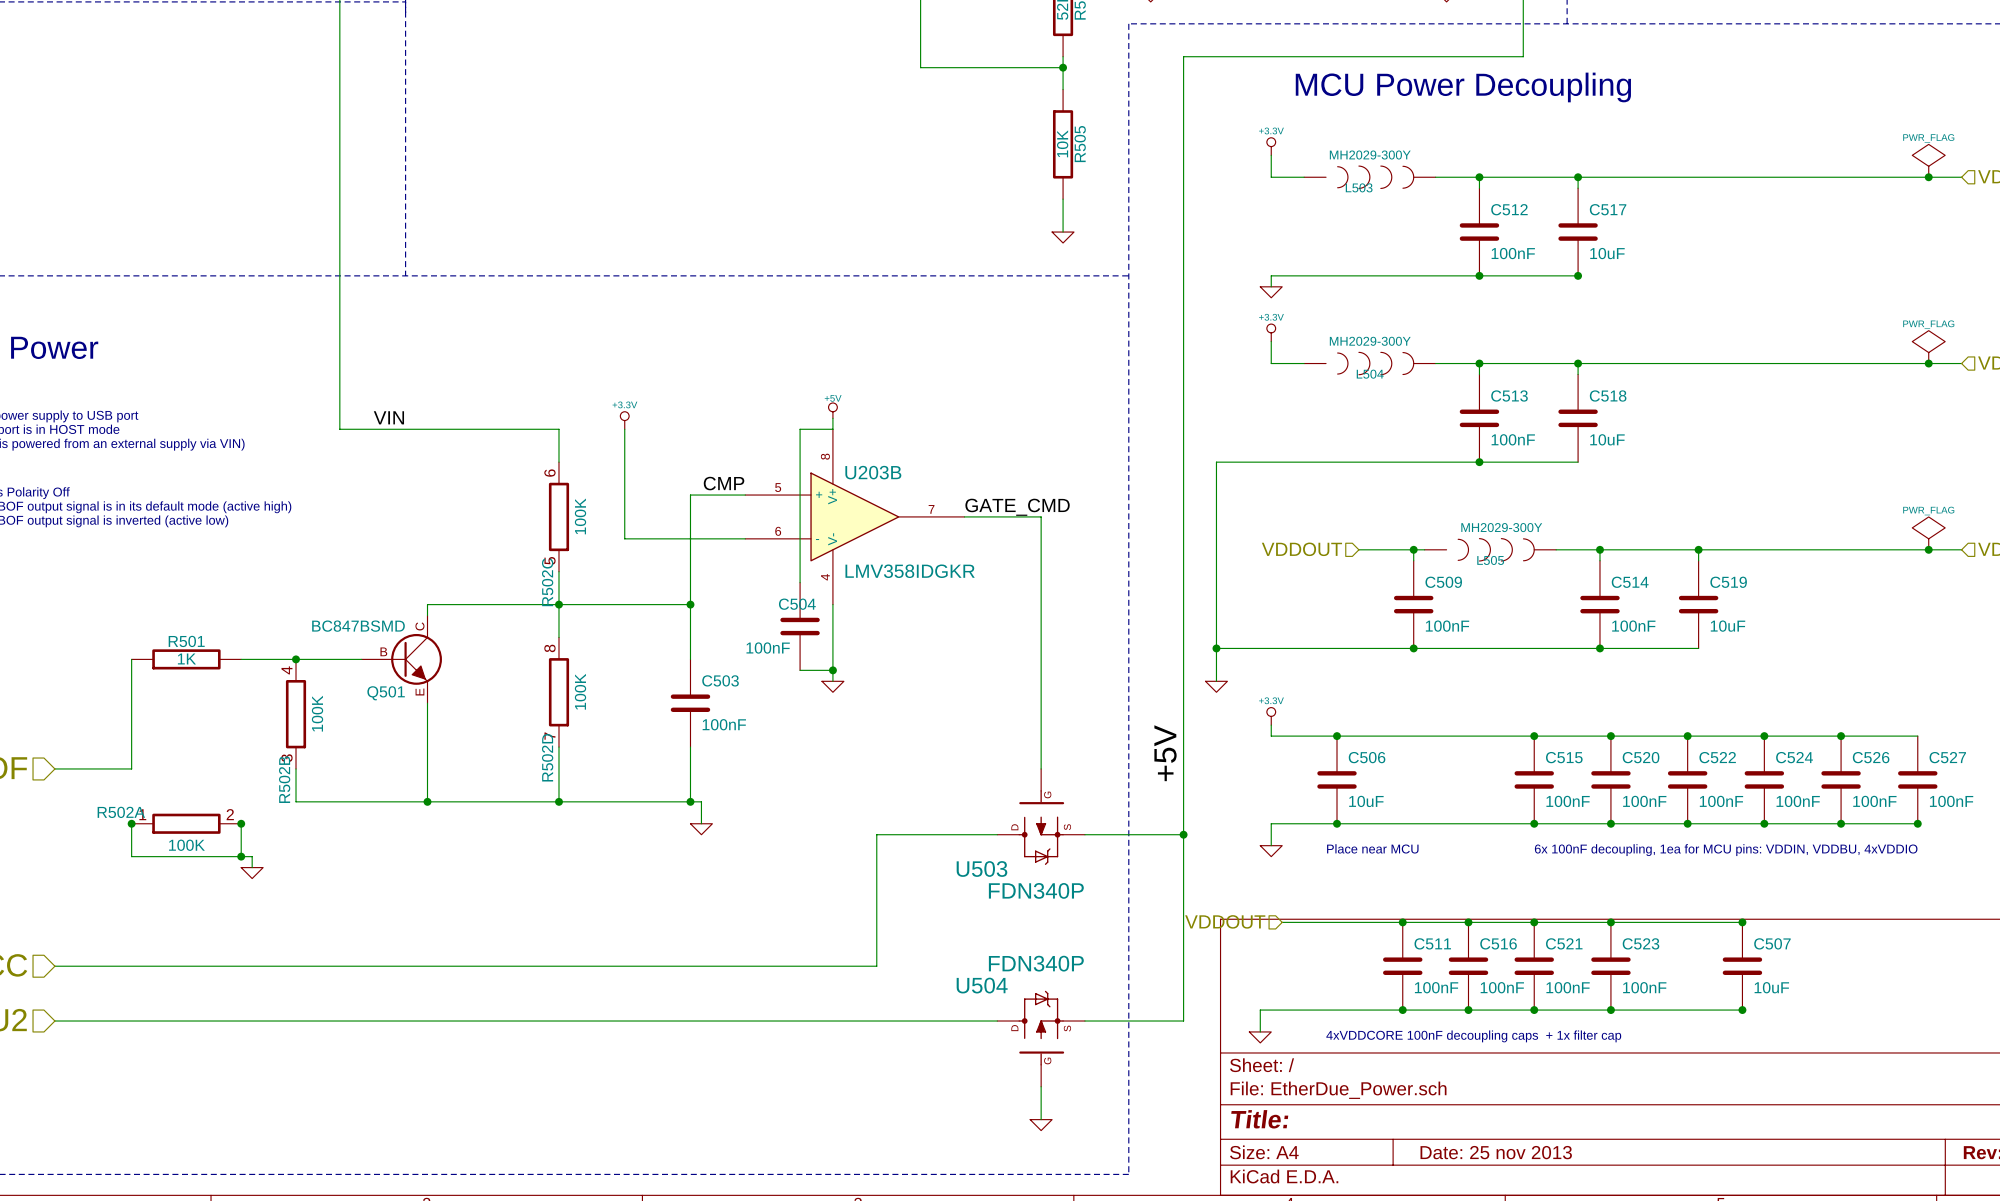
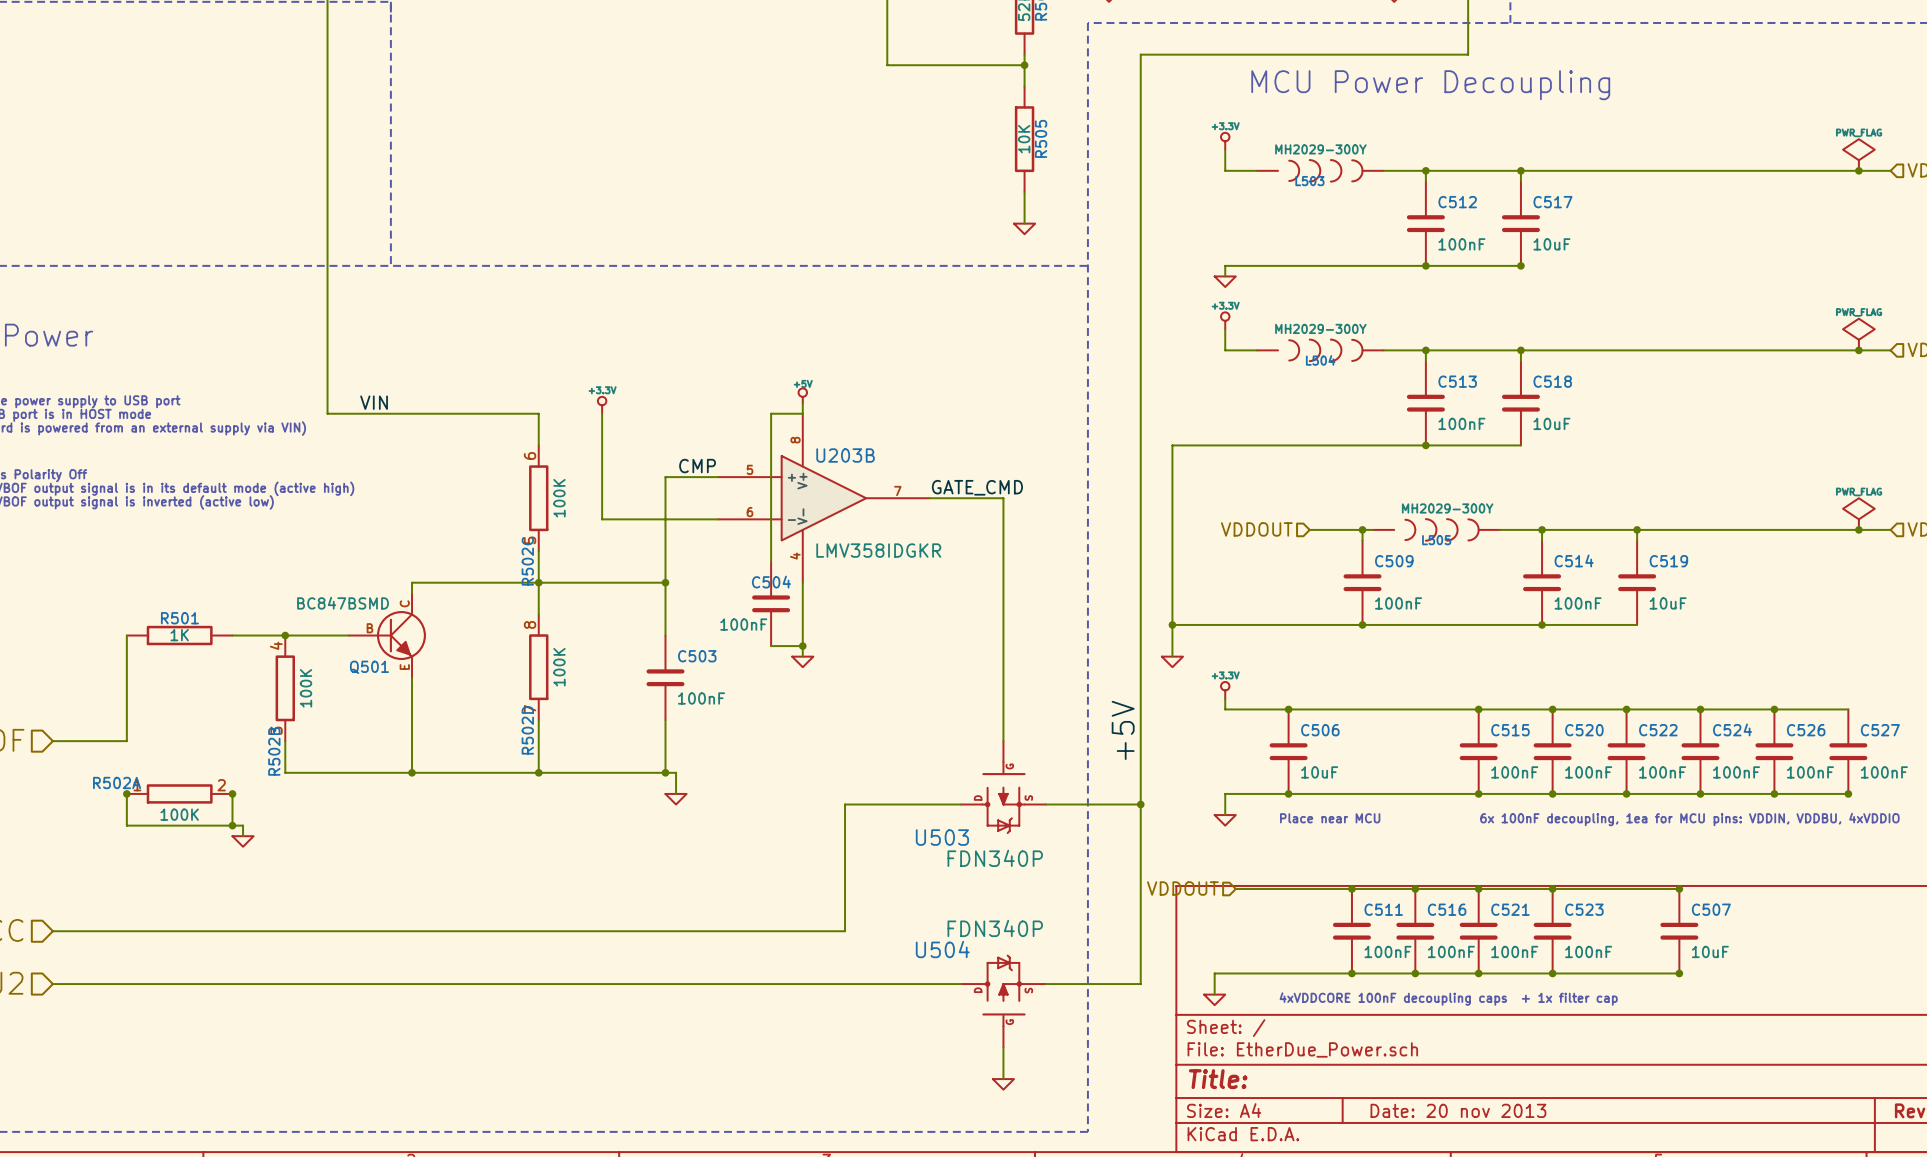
title block: Date: 25 nov 2013 (1496, 1152) -> Date: 20 nov 2013 (1458, 1110)

